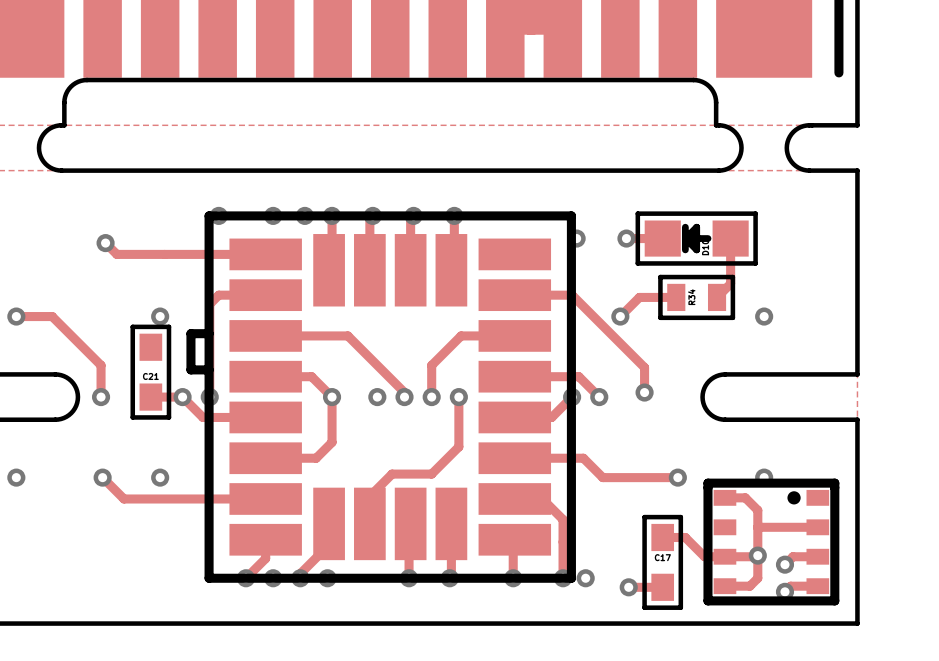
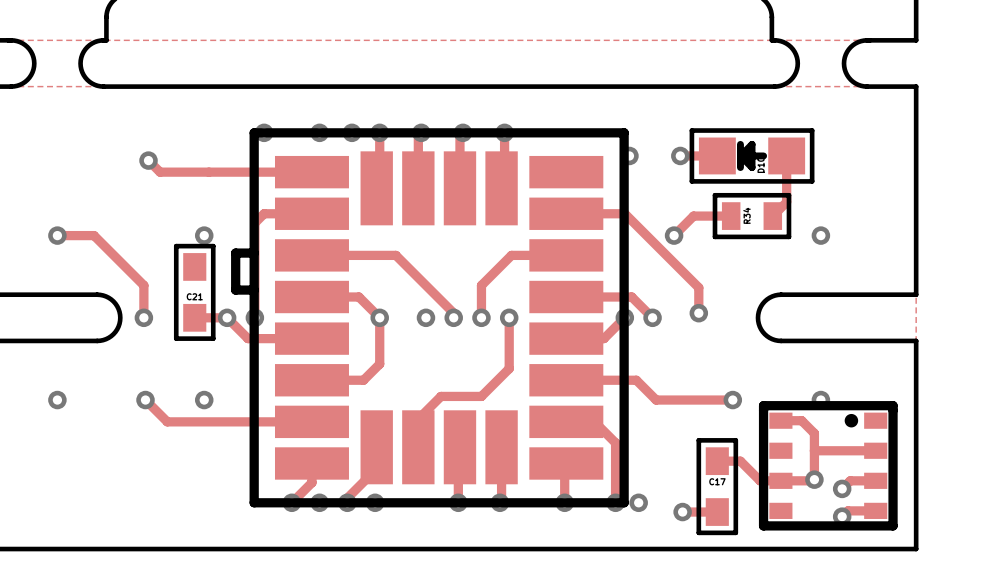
track: (757, 555) (757, 578) (749, 586) (724, 586) -> none

